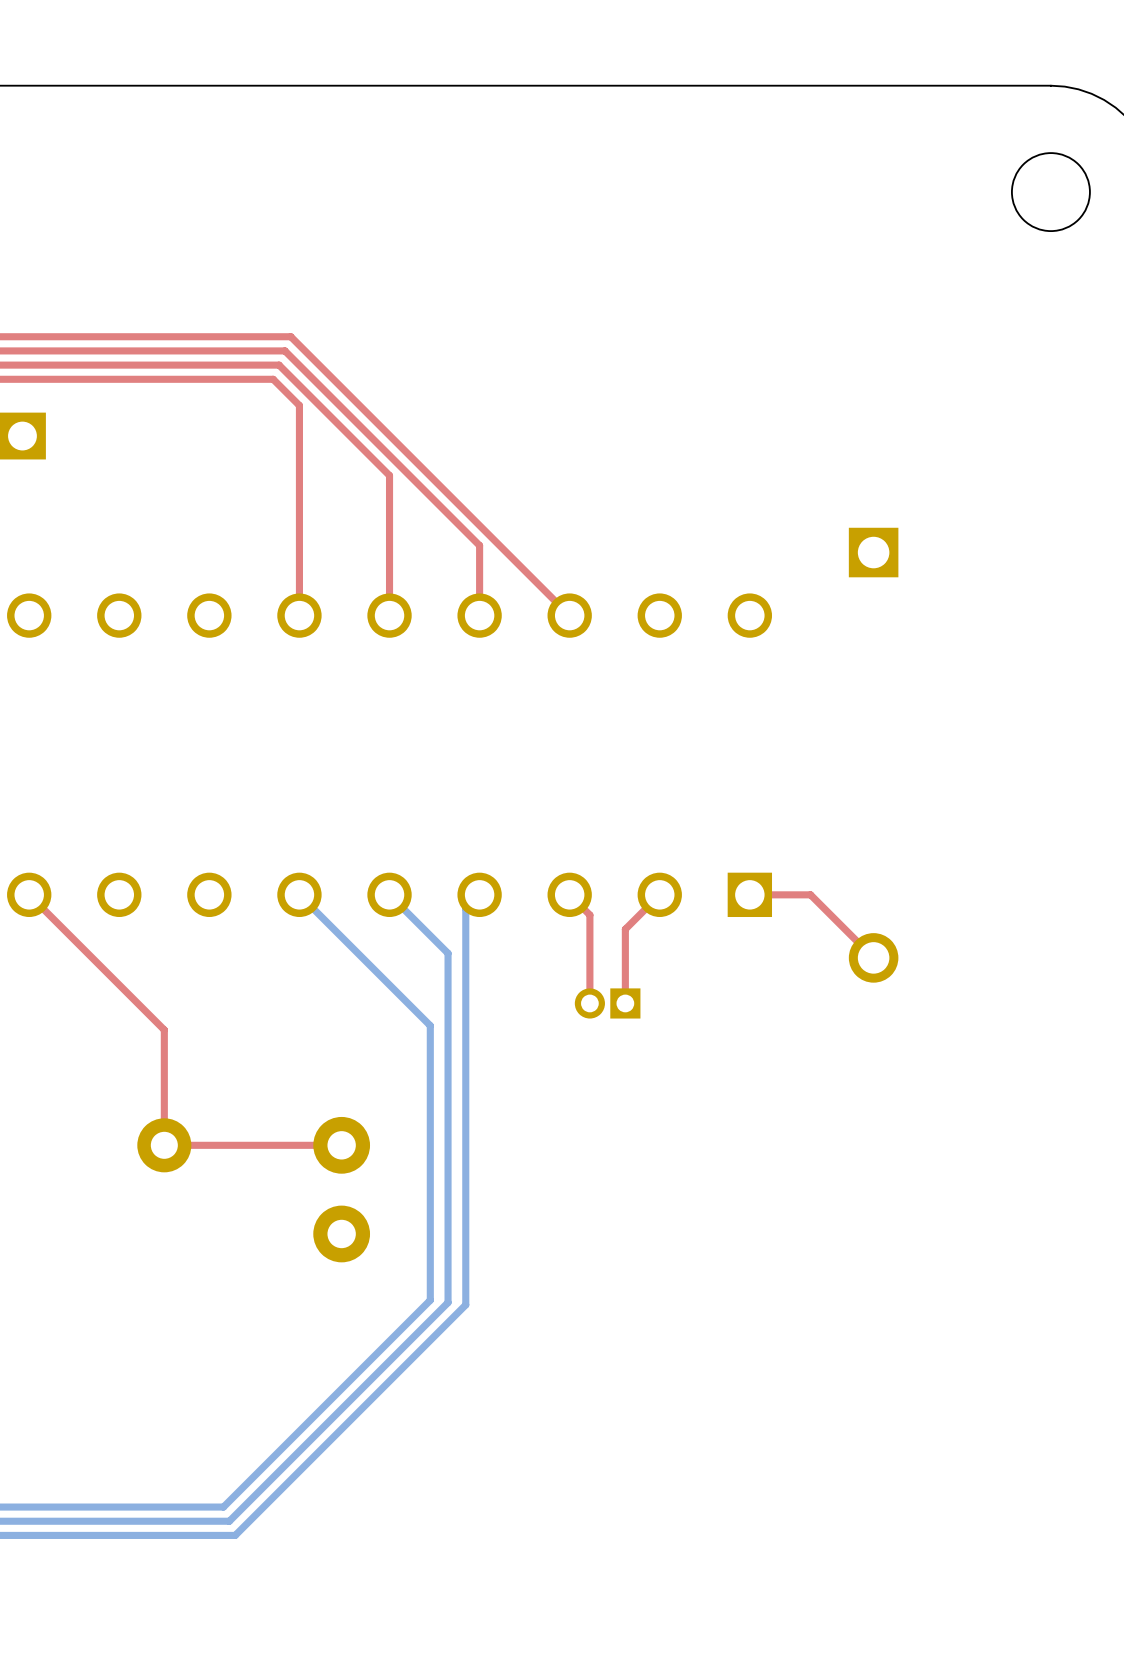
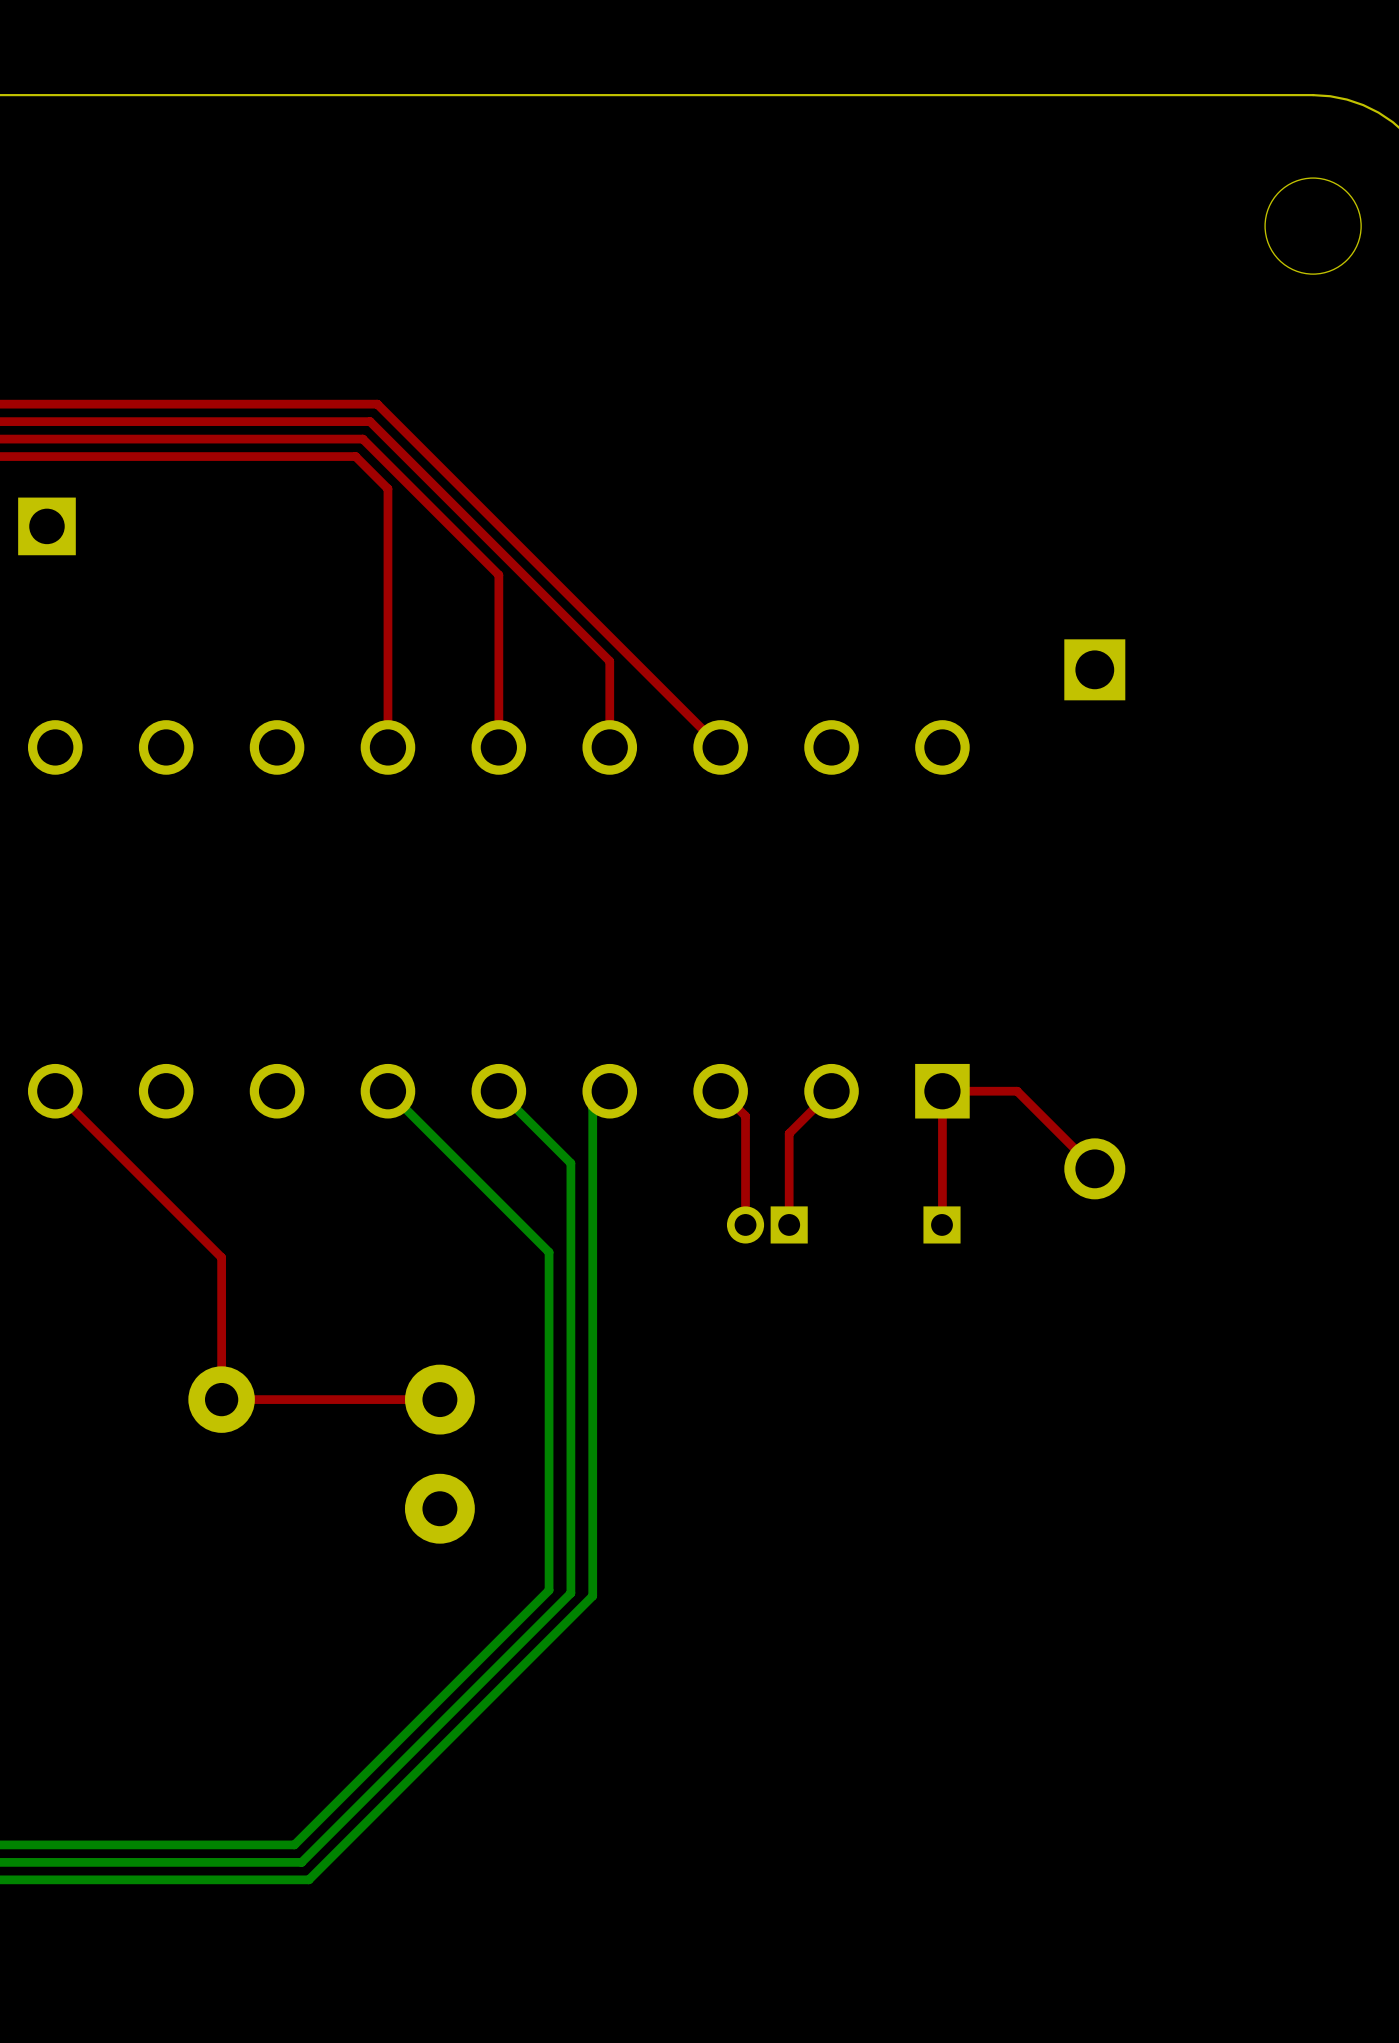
top track: none -> (942, 1091) (942, 1213)
part: none -> (942, 1224)

